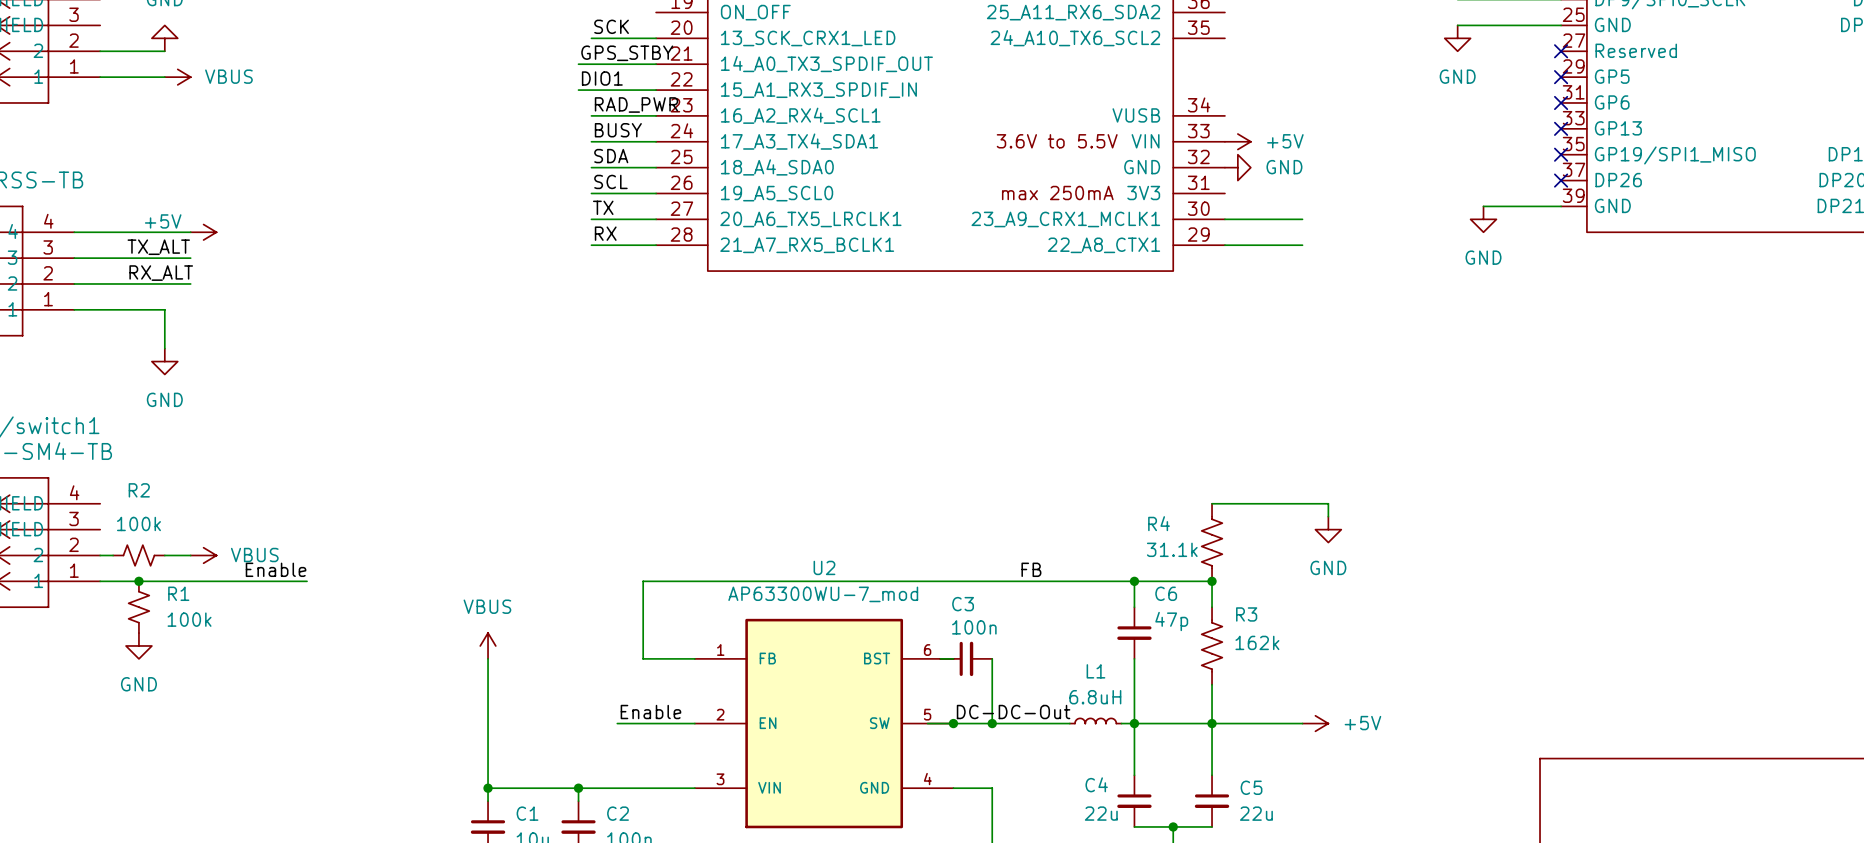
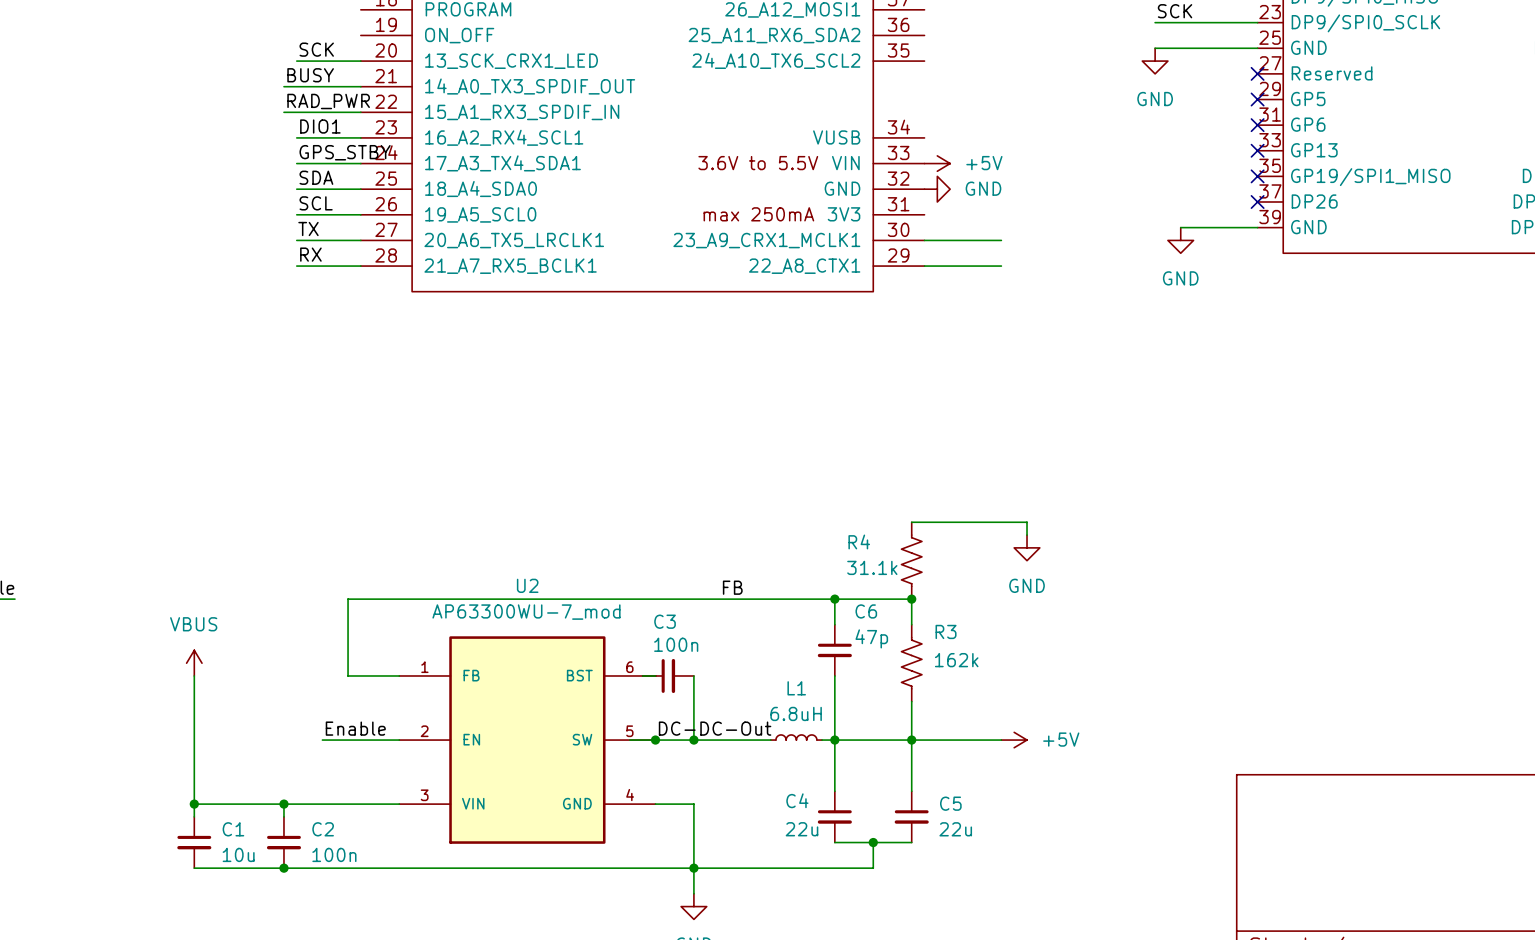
label: GPS_STBY (627, 53) -> BUSY (310, 75)
label: DIO1 (602, 78) -> RAD_PWR (328, 101)
label: RAD_PWR (636, 104) -> DIO1 (320, 126)
label: BUSY (618, 130) -> GPS_STBY (345, 152)

